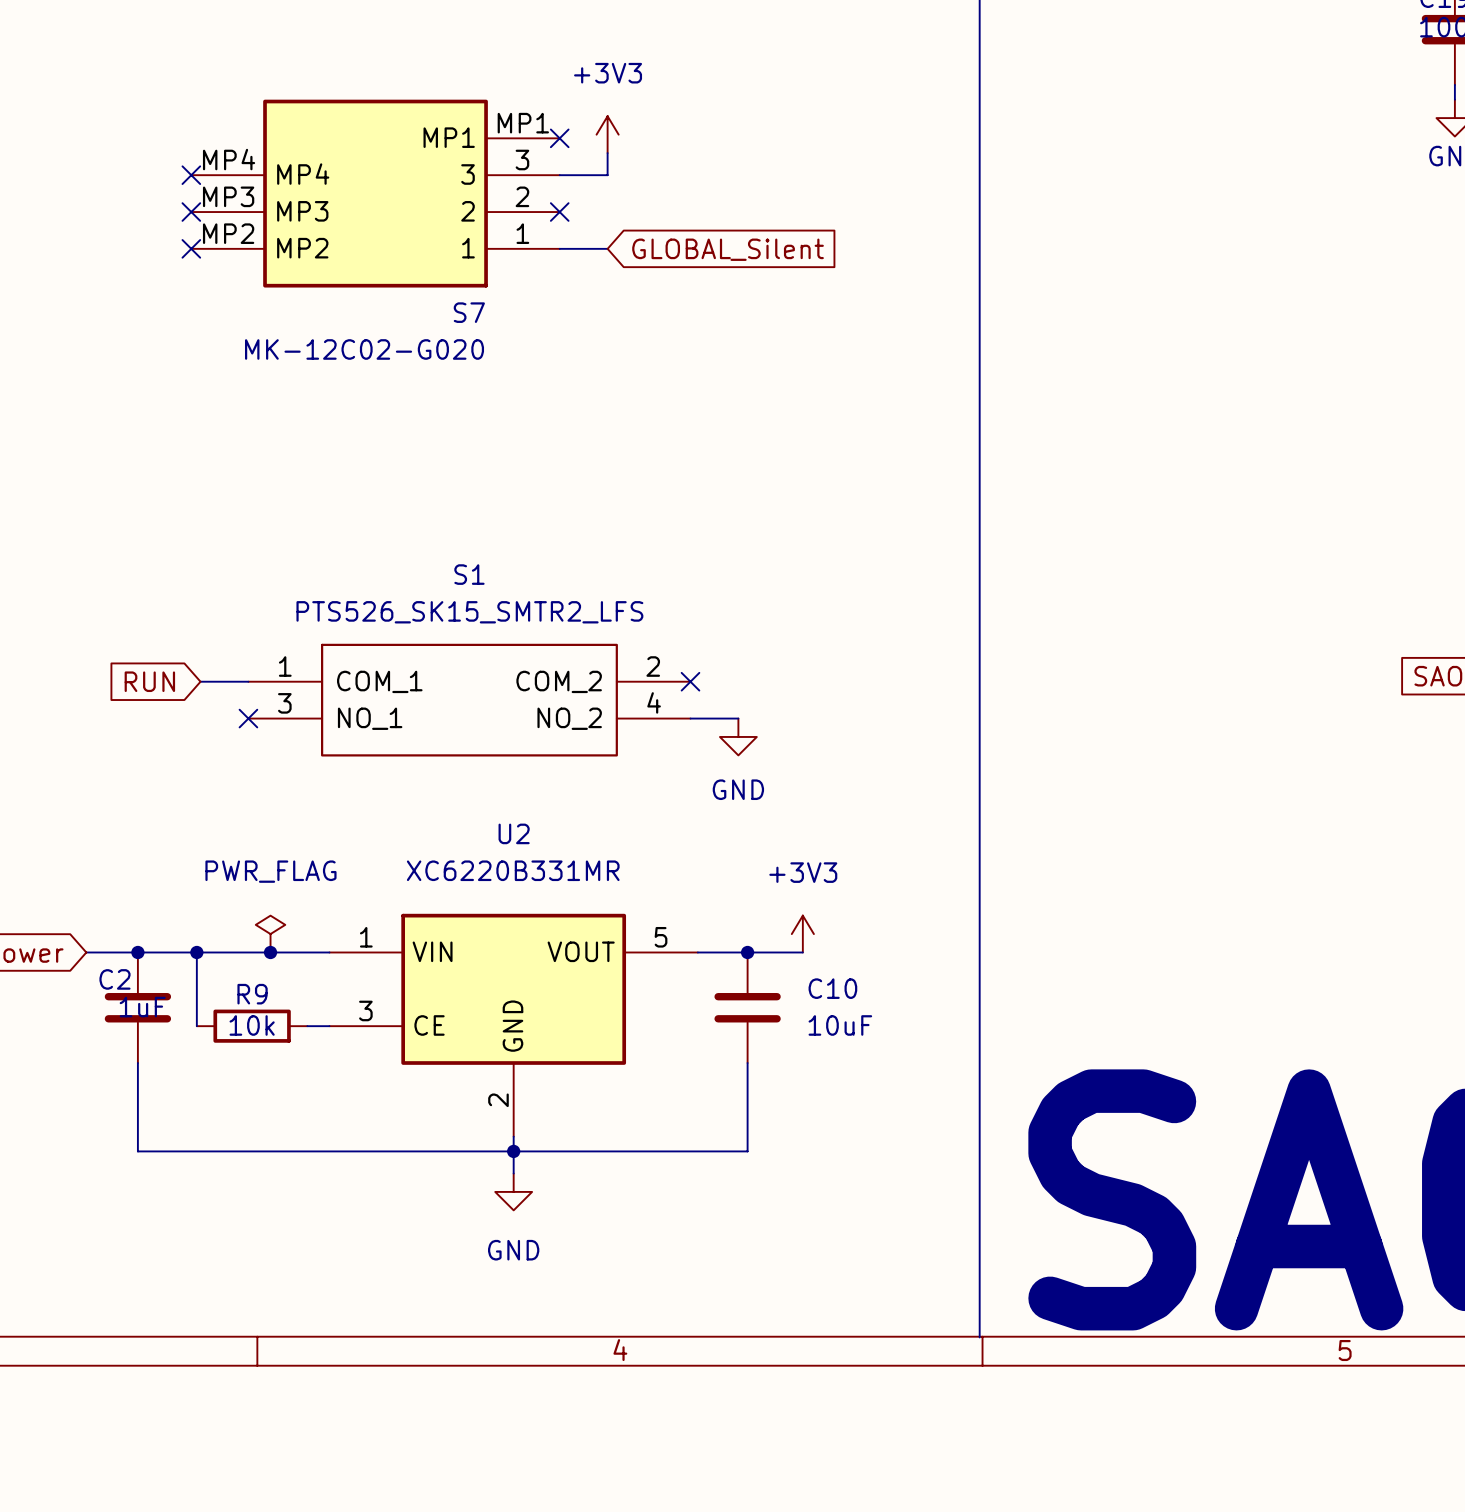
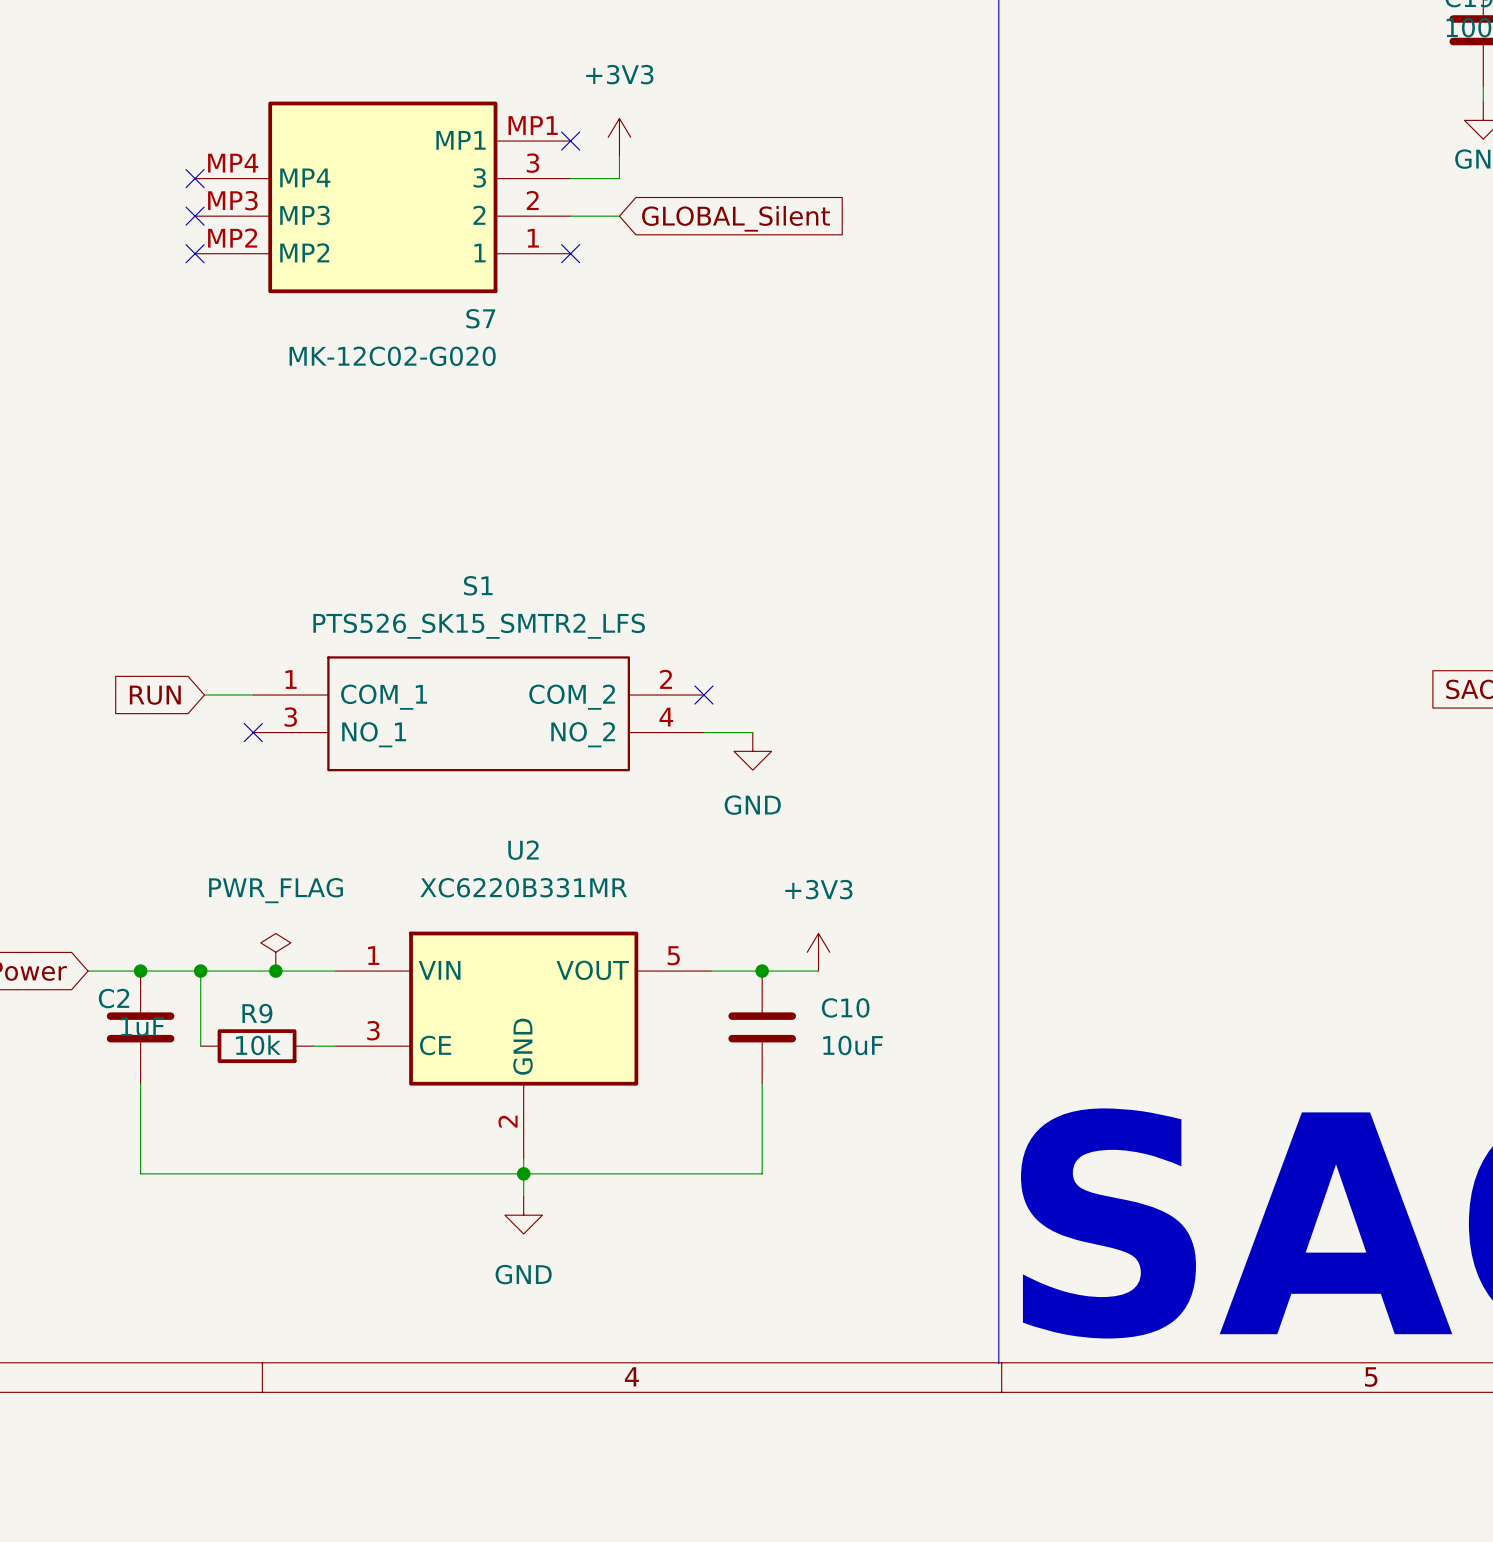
no-connect mark position: (559, 212) -> (570, 253)
wire: (559, 248) (607, 248) -> (570, 216) (619, 216)
global label position: GLOBAL_Silent (728, 249) -> GLOBAL_Silent (736, 218)

